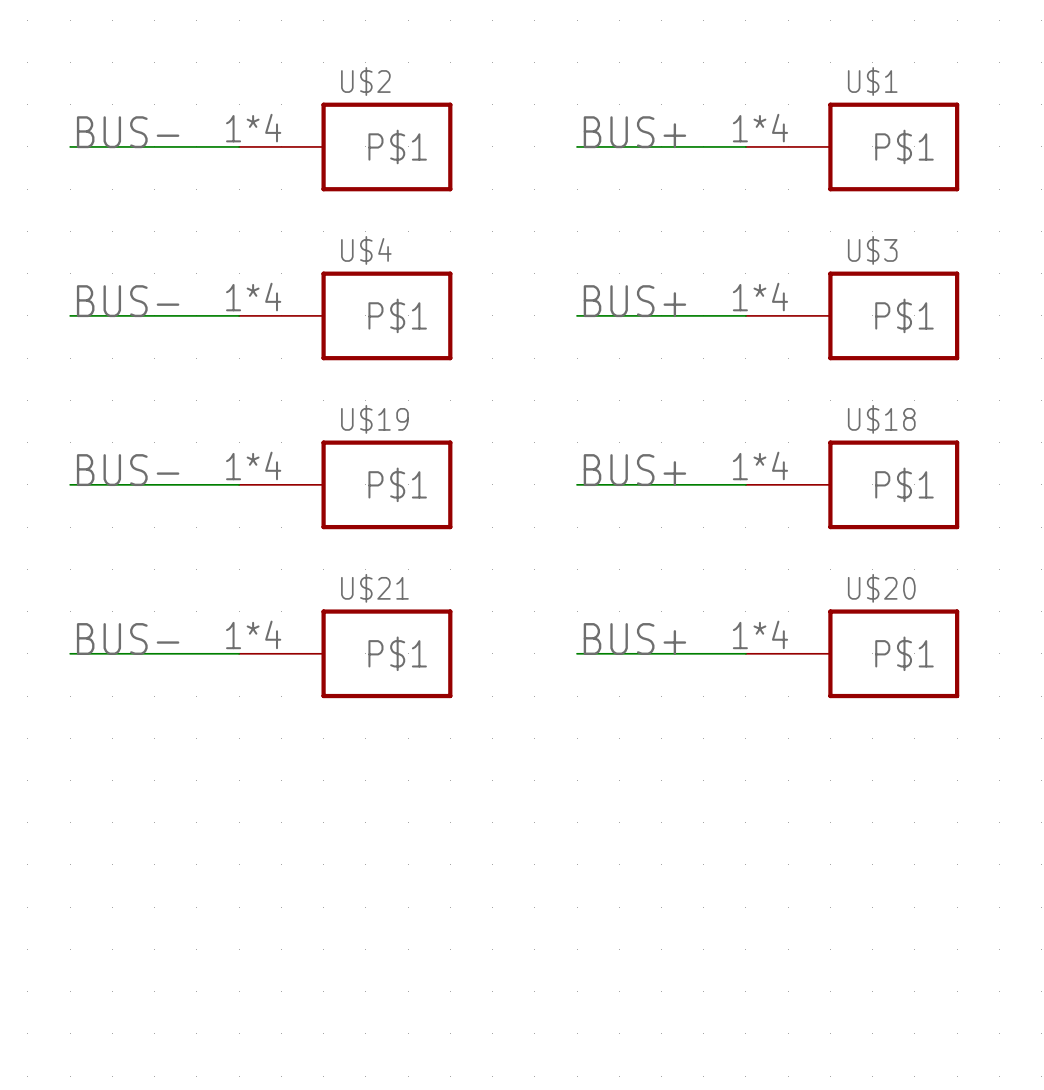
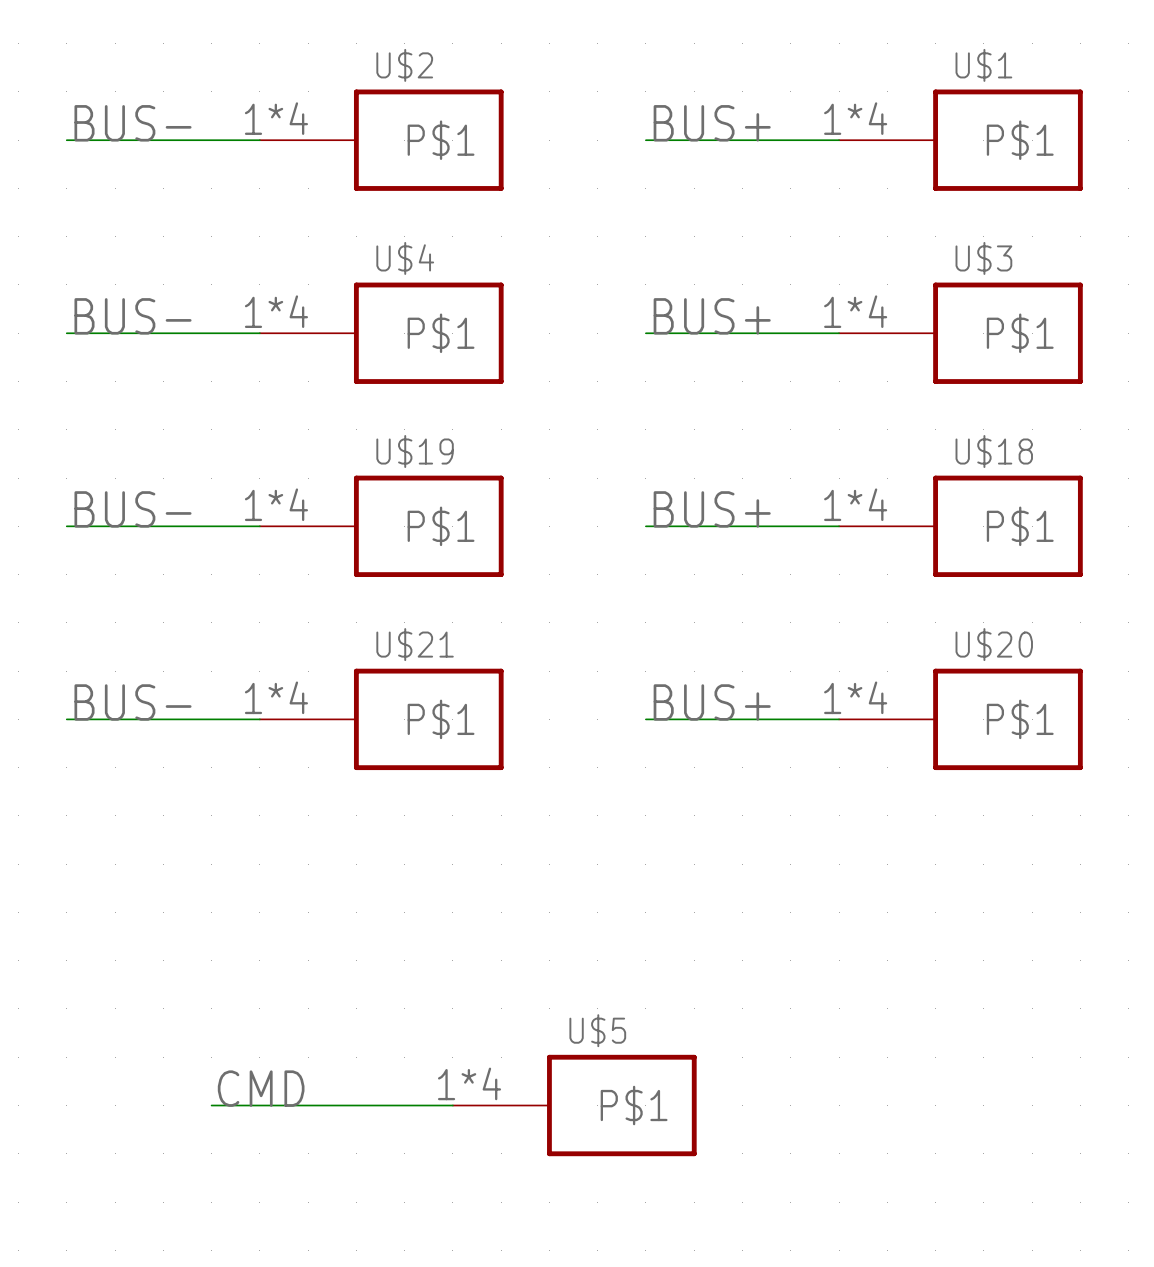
label: none -> CMD (261, 1088)
wire: none -> (211, 1105) (452, 1105)
U$5: none -> (574, 1105)

